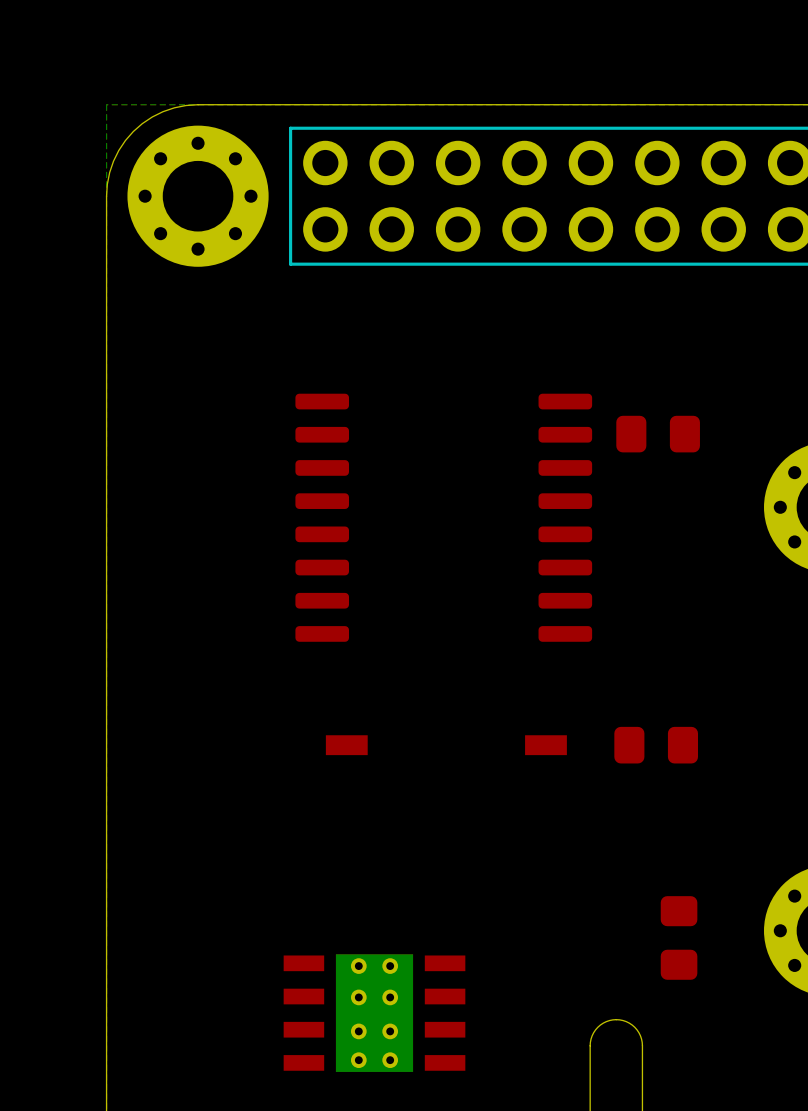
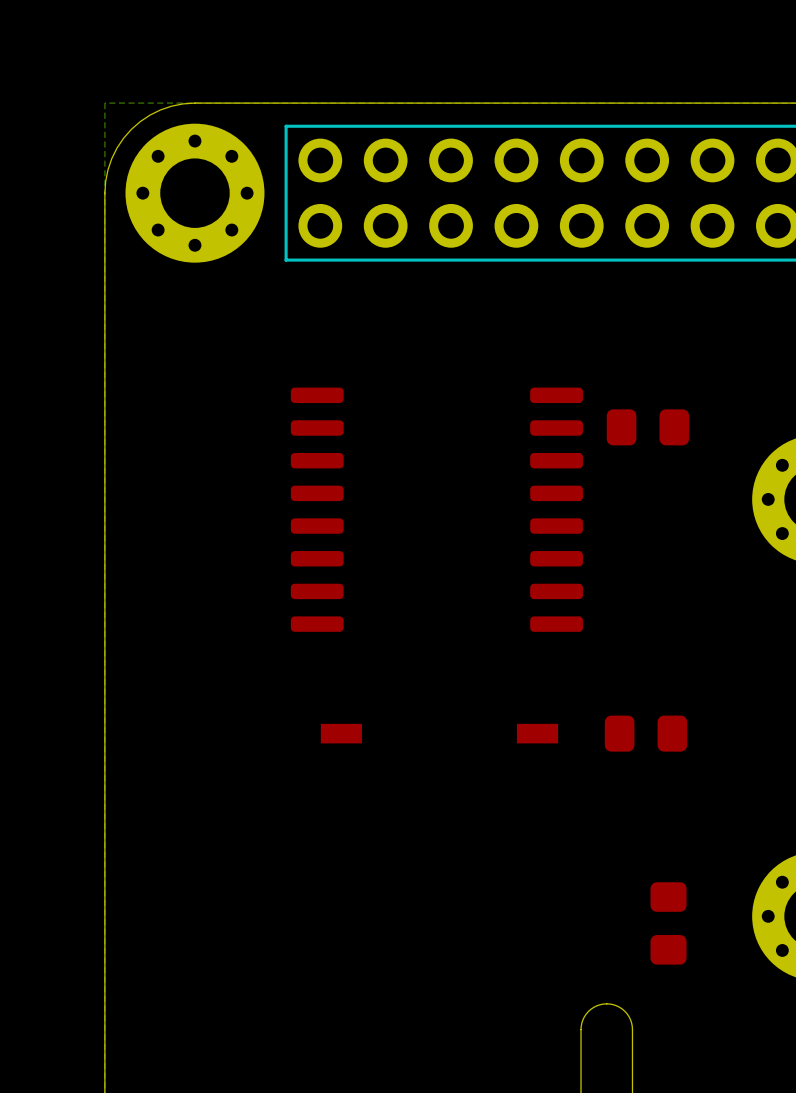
part: (374, 1013) -> none

